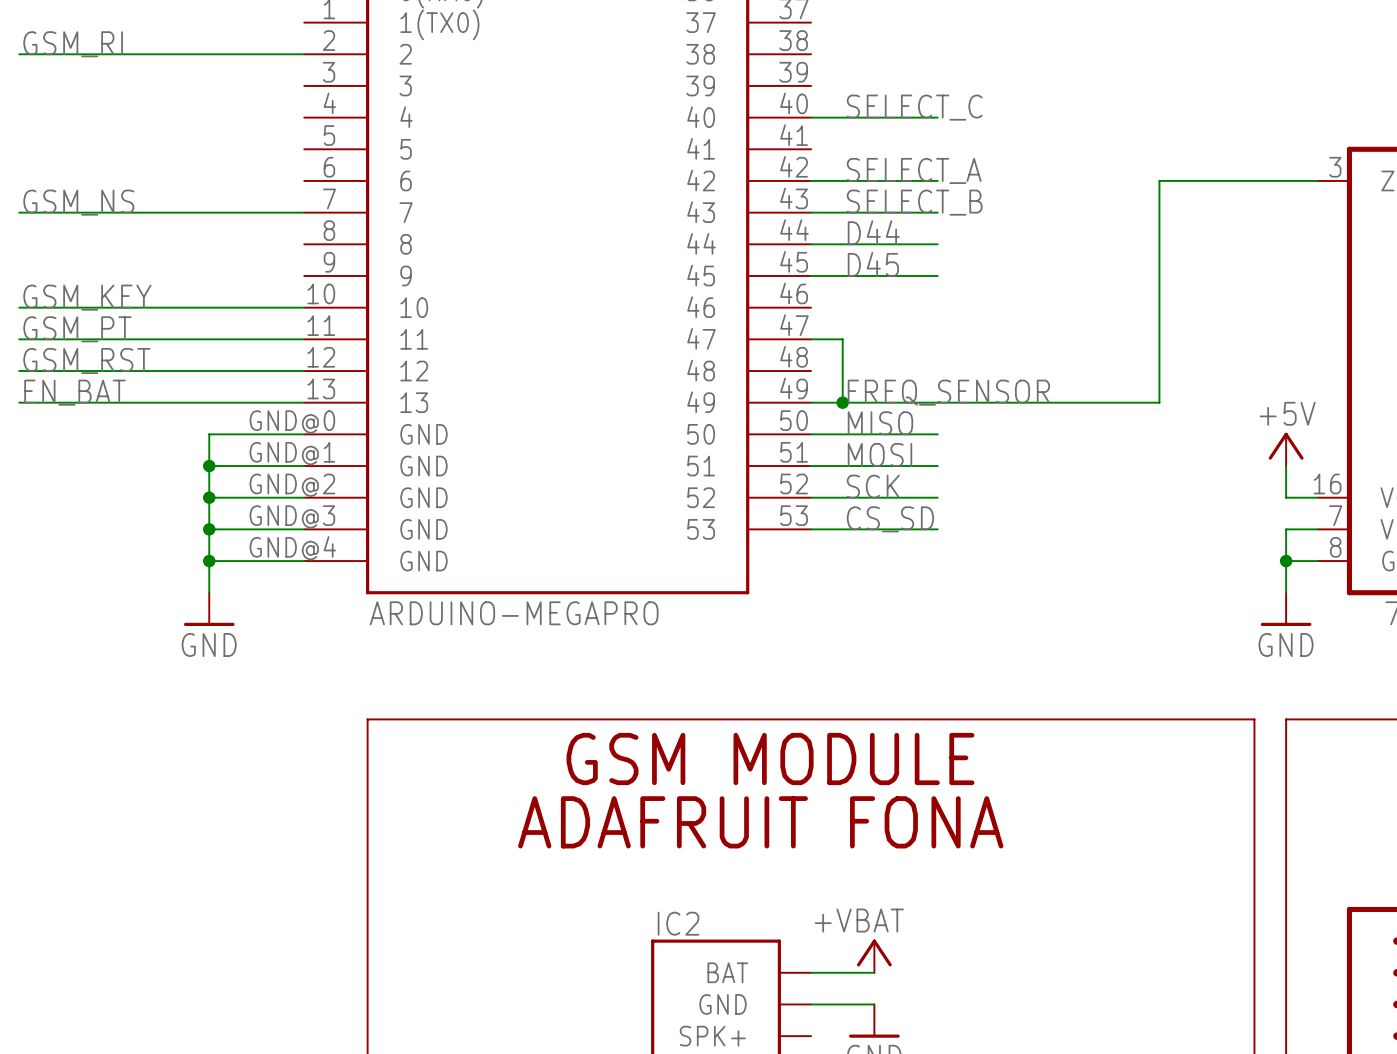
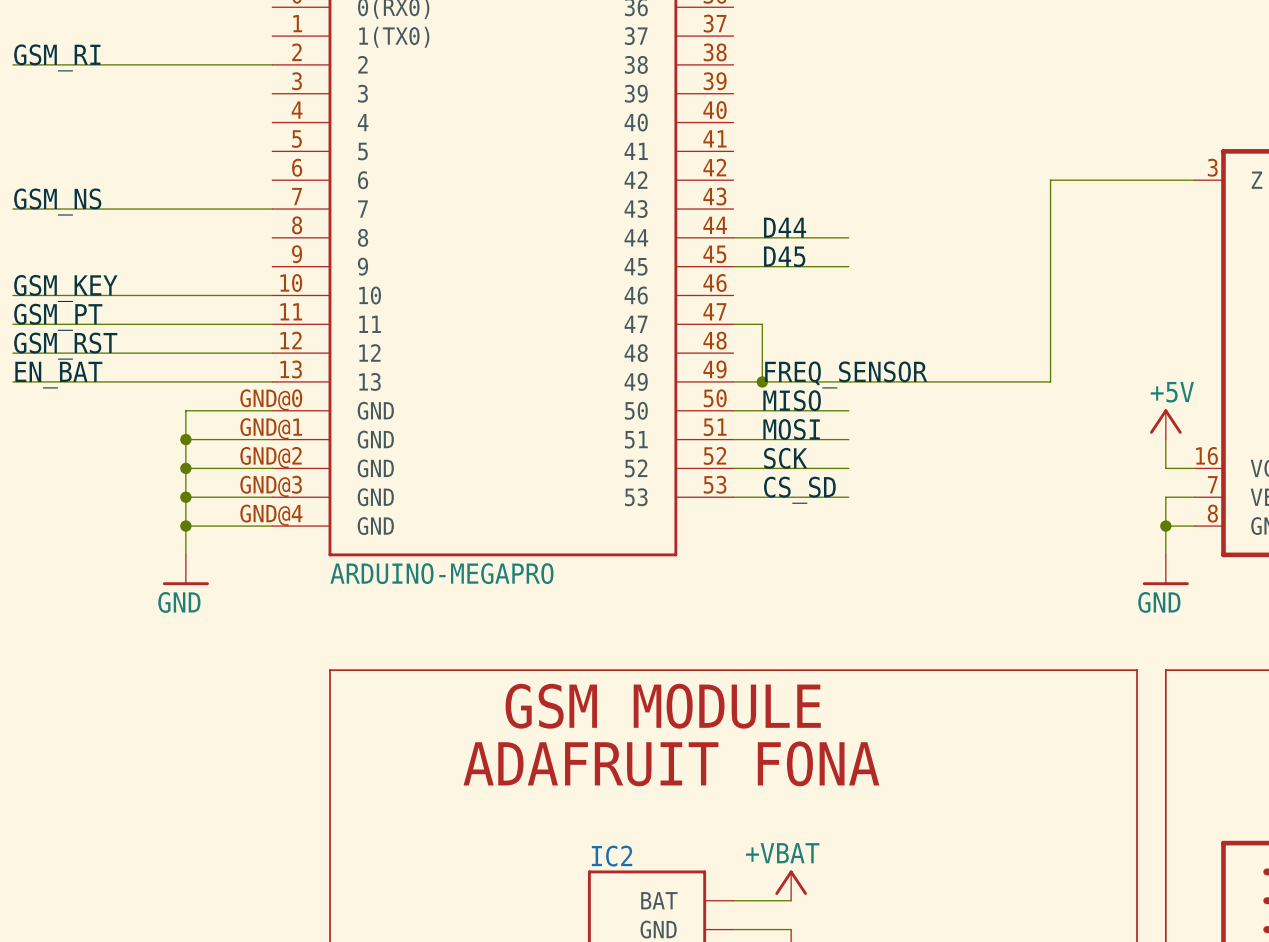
label: SELECT_C (914, 107) -> none
wire: (811, 117) (937, 117) -> none
label: SELECT_A (914, 170) -> none
wire: (811, 180) (937, 180) -> none
label: SELECT_B (914, 202) -> none
wire: (811, 212) (937, 212) -> none

